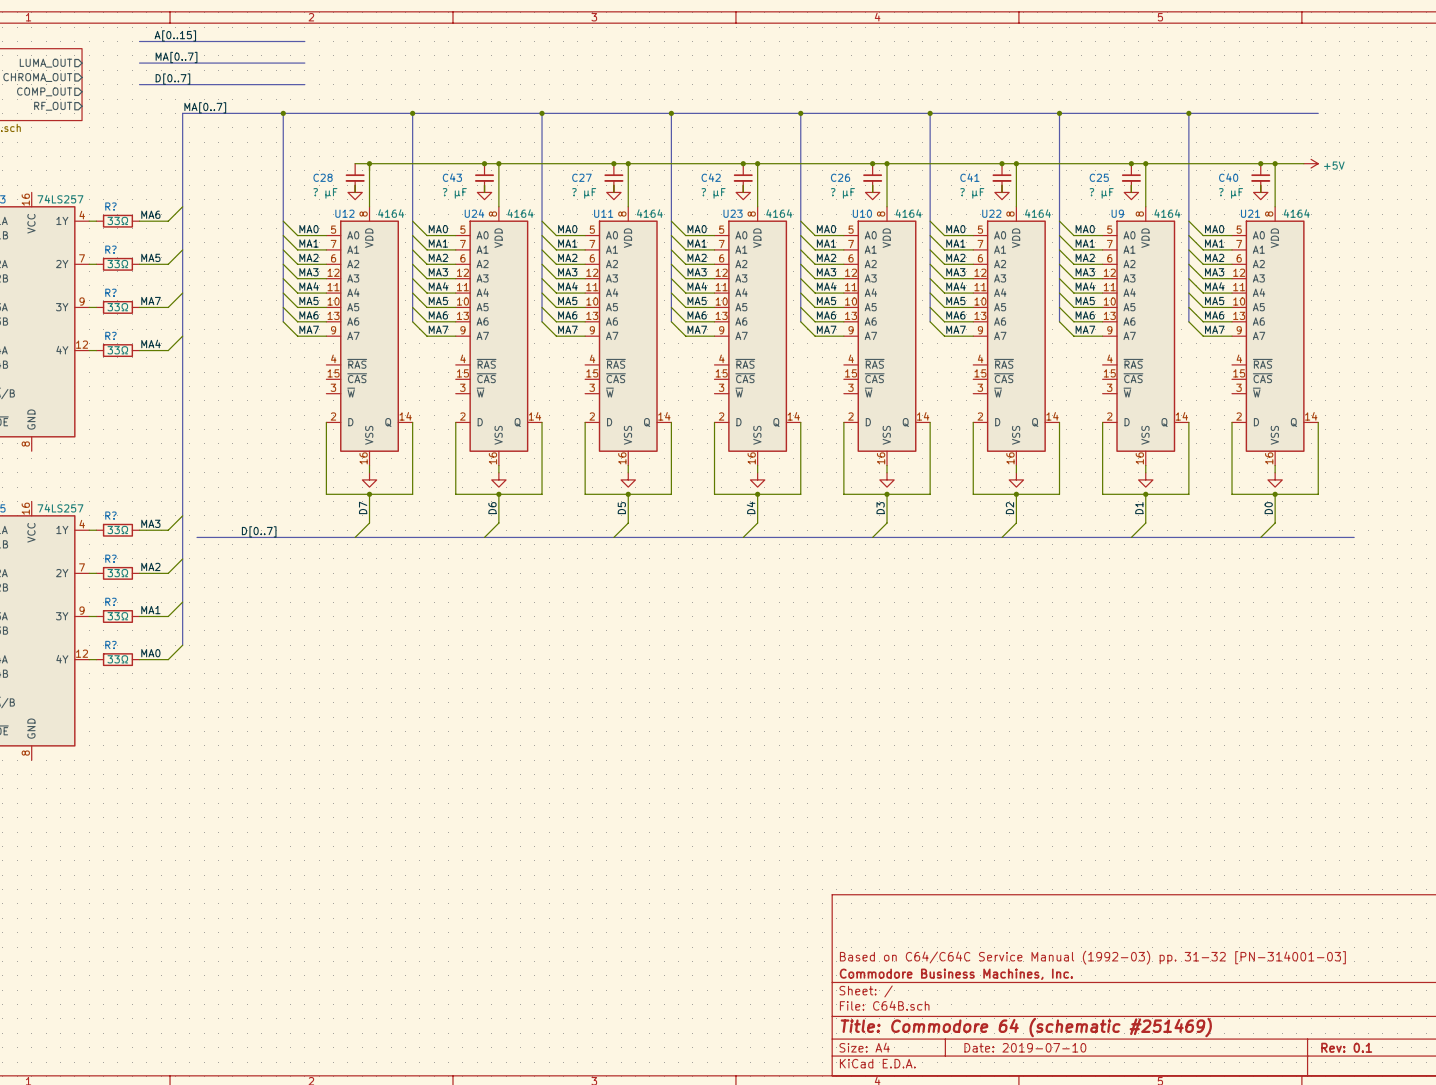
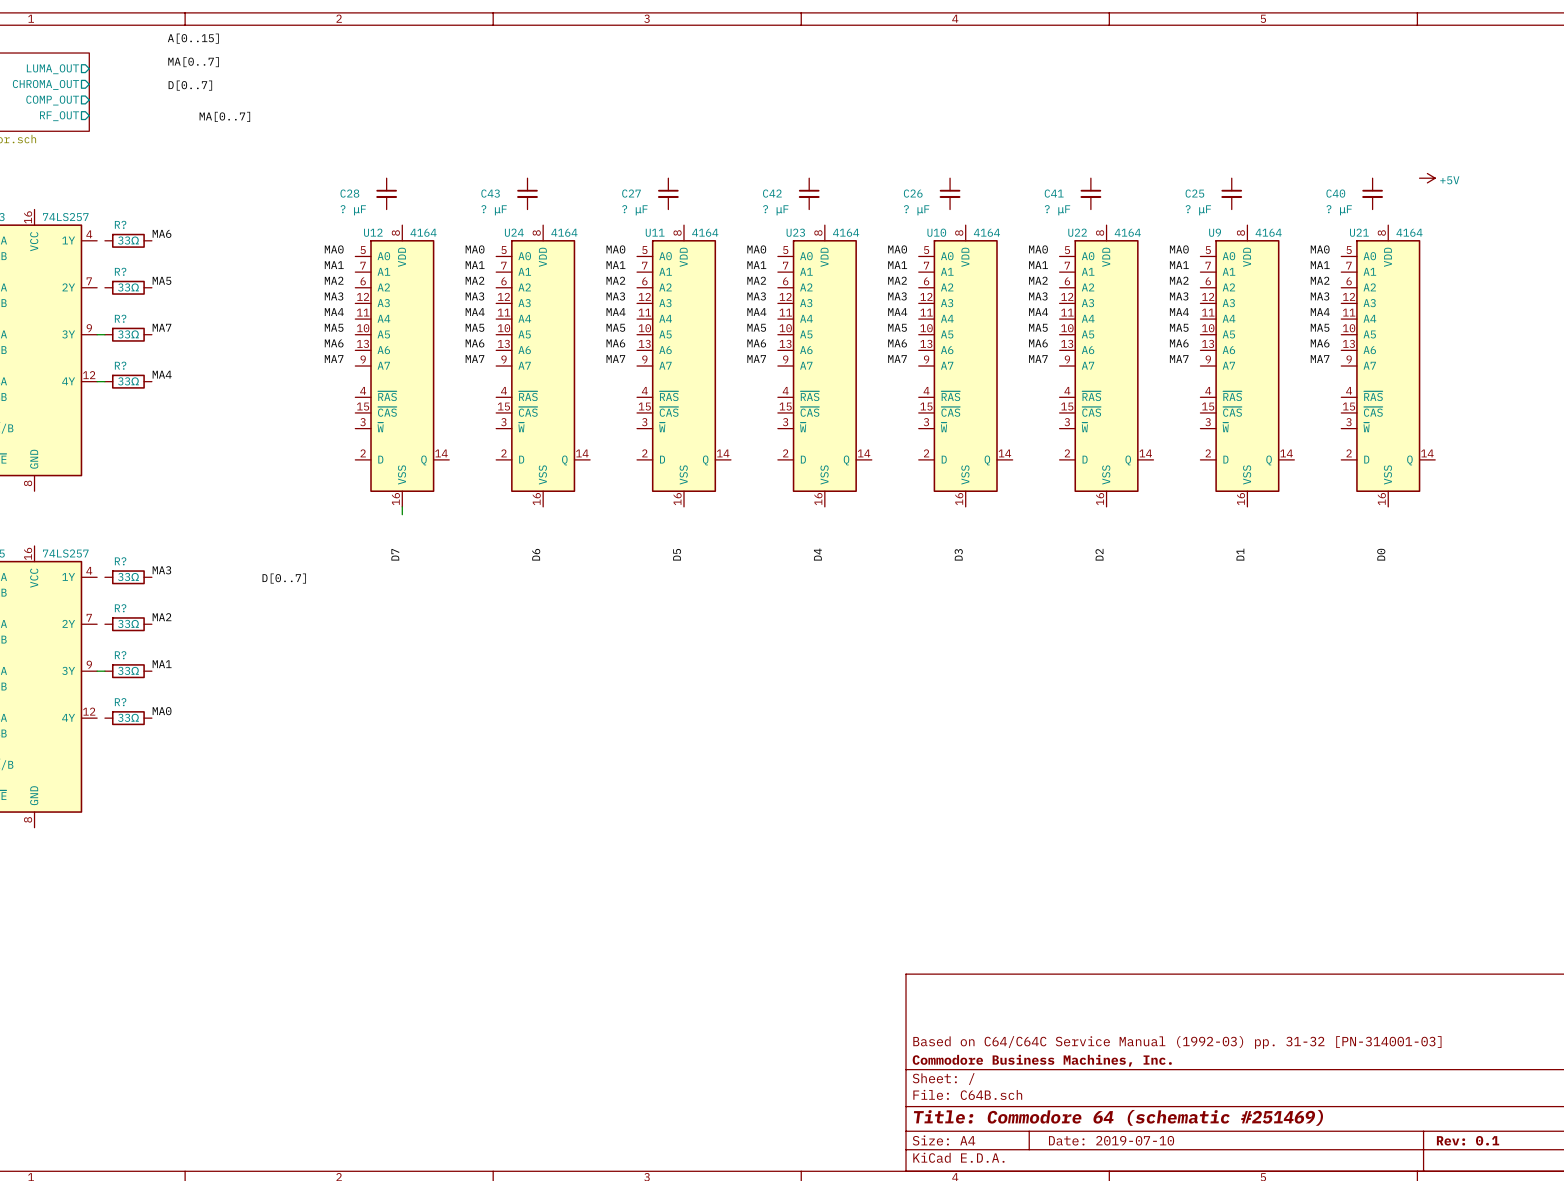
bus: (139, 41) (304, 41) -> none
bus: (139, 63) (304, 63) -> none
bus: (139, 84) (304, 84) -> none
bus: (283, 113) (283, 321) -> none
junction: (283, 113) -> none
bus: (412, 113) (412, 321) -> none
junction: (412, 113) -> none
bus: (542, 113) (542, 321) -> none
junction: (542, 113) -> none
bus: (671, 113) (671, 321) -> none
junction: (671, 113) -> none
bus: (800, 113) (800, 321) -> none
junction: (800, 113) -> none
bus: (930, 113) (930, 321) -> none
junction: (930, 113) -> none
bus: (1059, 113) (1059, 321) -> none
junction: (1059, 113) -> none
bus: (1188, 113) (1188, 321) -> none
junction: (1188, 113) -> none
bus: (1318, 113) (182, 113) (182, 645) -> none
wire: (355, 163) (1303, 163) -> none
wire: (369, 163) (369, 206) -> none
junction: (369, 163) -> none
junction: (484, 163) -> none
wire: (498, 163) (498, 206) -> none
junction: (498, 163) -> none
junction: (613, 163) -> none
wire: (628, 163) (628, 206) -> none
junction: (628, 163) -> none
junction: (743, 163) -> none
wire: (757, 163) (757, 206) -> none
junction: (757, 163) -> none
junction: (872, 163) -> none
wire: (887, 163) (887, 206) -> none
junction: (887, 163) -> none
junction: (1002, 163) -> none
wire: (1016, 163) (1016, 206) -> none
junction: (1016, 163) -> none
junction: (1131, 163) -> none
wire: (1145, 163) (1145, 206) -> none
junction: (1145, 163) -> none
junction: (1260, 163) -> none
wire: (1275, 163) (1275, 206) -> none
junction: (1275, 163) -> none
power symbol: (355, 192) -> none
power symbol: (484, 192) -> none
power symbol: (613, 192) -> none
power symbol: (743, 192) -> none
power symbol: (872, 192) -> none
power symbol: (1002, 192) -> none
power symbol: (1131, 192) -> none
power symbol: (1260, 192) -> none
wire: (182, 206) (168, 221) (139, 221) -> none
wire: (89, 221) (96, 221) -> none
wire: (283, 221) (297, 235) (326, 235) -> none
wire: (412, 221) (427, 235) (455, 235) -> none
wire: (542, 221) (556, 235) (585, 235) -> none
wire: (671, 221) (685, 235) (714, 235) -> none
wire: (800, 221) (815, 235) (843, 235) -> none
wire: (930, 221) (944, 235) (973, 235) -> none
wire: (1059, 221) (1073, 235) (1102, 235) -> none
wire: (1188, 221) (1203, 235) (1232, 235) -> none
wire: (283, 235) (297, 249) (326, 249) -> none
wire: (412, 235) (427, 249) (455, 249) -> none
wire: (542, 235) (556, 249) (585, 249) -> none
wire: (671, 235) (685, 249) (714, 249) -> none
wire: (800, 235) (815, 249) (843, 249) -> none
wire: (930, 235) (944, 249) (973, 249) -> none
wire: (1059, 235) (1073, 249) (1102, 249) -> none
wire: (1188, 235) (1203, 249) (1232, 249) -> none
wire: (182, 249) (168, 264) (139, 264) -> none
wire: (283, 249) (297, 264) (326, 264) -> none
wire: (412, 249) (427, 264) (455, 264) -> none
wire: (542, 249) (556, 264) (585, 264) -> none
wire: (671, 249) (685, 264) (714, 264) -> none
wire: (800, 249) (815, 264) (843, 264) -> none
wire: (930, 249) (944, 264) (973, 264) -> none
wire: (1059, 249) (1073, 264) (1102, 264) -> none
wire: (1188, 249) (1203, 264) (1232, 264) -> none
wire: (89, 264) (96, 264) -> none
wire: (283, 264) (297, 278) (326, 278) -> none
wire: (412, 264) (427, 278) (455, 278) -> none
wire: (542, 264) (556, 278) (585, 278) -> none
wire: (671, 264) (685, 278) (714, 278) -> none
wire: (800, 264) (815, 278) (843, 278) -> none
wire: (930, 264) (944, 278) (973, 278) -> none
wire: (1059, 264) (1073, 278) (1102, 278) -> none
wire: (1188, 264) (1203, 278) (1232, 278) -> none
wire: (283, 278) (297, 293) (326, 293) -> none
wire: (412, 278) (427, 293) (455, 293) -> none
wire: (542, 278) (556, 293) (585, 293) -> none
wire: (671, 278) (685, 293) (714, 293) -> none
wire: (800, 278) (815, 293) (843, 293) -> none
wire: (930, 278) (944, 293) (973, 293) -> none
wire: (1059, 278) (1073, 293) (1102, 293) -> none
wire: (1188, 278) (1203, 293) (1232, 293) -> none
wire: (182, 293) (168, 307) (139, 307) -> none
wire: (283, 293) (297, 307) (326, 307) -> none
wire: (412, 293) (427, 307) (455, 307) -> none
wire: (542, 293) (556, 307) (585, 307) -> none
wire: (671, 293) (685, 307) (714, 307) -> none
wire: (800, 293) (815, 307) (843, 307) -> none
wire: (930, 293) (944, 307) (973, 307) -> none
wire: (1059, 293) (1073, 307) (1102, 307) -> none
wire: (1188, 293) (1203, 307) (1232, 307) -> none
wire: (283, 307) (297, 321) (326, 321) -> none
wire: (412, 307) (427, 321) (455, 321) -> none
wire: (542, 307) (556, 321) (585, 321) -> none
wire: (671, 307) (685, 321) (714, 321) -> none
wire: (800, 307) (815, 321) (843, 321) -> none
wire: (930, 307) (944, 321) (973, 321) -> none
wire: (1059, 307) (1073, 321) (1102, 321) -> none
wire: (1188, 307) (1203, 321) (1232, 321) -> none
wire: (283, 321) (297, 336) (326, 336) -> none
wire: (412, 321) (427, 336) (455, 336) -> none
wire: (542, 321) (556, 336) (585, 336) -> none
wire: (671, 321) (685, 336) (714, 336) -> none
wire: (800, 321) (815, 336) (843, 336) -> none
wire: (930, 321) (944, 336) (973, 336) -> none
wire: (1059, 321) (1073, 336) (1102, 336) -> none
wire: (1188, 321) (1203, 336) (1232, 336) -> none
wire: (182, 336) (168, 350) (139, 350) -> none
wire: (326, 422) (326, 494) (412, 494) (412, 422) -> none
wire: (455, 422) (455, 494) (542, 494) (542, 422) -> none
wire: (585, 422) (585, 494) (671, 494) (671, 422) -> none
wire: (714, 422) (714, 494) (800, 494) (800, 422) -> none
wire: (843, 422) (843, 494) (930, 494) (930, 422) -> none
wire: (973, 422) (973, 494) (1059, 494) (1059, 422) -> none
wire: (1102, 422) (1102, 494) (1188, 494) (1188, 422) -> none
wire: (1232, 422) (1232, 494) (1318, 494) (1318, 422) -> none
wire: (498, 465) (498, 472) -> none
wire: (628, 465) (628, 472) -> none
wire: (757, 465) (757, 472) -> none
wire: (887, 465) (887, 472) -> none
wire: (1016, 465) (1016, 472) -> none
wire: (1145, 465) (1145, 472) -> none
wire: (1275, 465) (1275, 472) -> none
power symbol: (369, 479) -> none
power symbol: (498, 479) -> none
power symbol: (628, 479) -> none
power symbol: (757, 479) -> none
power symbol: (887, 479) -> none
power symbol: (1016, 479) -> none
power symbol: (1145, 479) -> none
power symbol: (1275, 479) -> none
wire: (369, 494) (369, 523) (355, 537) -> none
junction: (369, 494) -> none
wire: (498, 494) (498, 523) (484, 537) -> none
junction: (498, 494) -> none
wire: (628, 494) (628, 523) (613, 537) -> none
junction: (628, 494) -> none
wire: (757, 494) (757, 523) (743, 537) -> none
junction: (757, 494) -> none
wire: (887, 494) (887, 523) (872, 537) -> none
junction: (887, 494) -> none
wire: (1016, 494) (1016, 523) (1002, 537) -> none
junction: (1016, 494) -> none
wire: (1145, 494) (1145, 523) (1131, 537) -> none
junction: (1145, 494) -> none
wire: (1275, 494) (1275, 523) (1260, 537) -> none
junction: (1275, 494) -> none
wire: (182, 515) (168, 530) (139, 530) -> none
wire: (89, 530) (96, 530) -> none
bus: (197, 537) (1354, 537) -> none
wire: (182, 558) (168, 573) (139, 573) -> none
wire: (89, 573) (96, 573) -> none
wire: (182, 602) (168, 616) (139, 616) -> none
wire: (182, 645) (168, 659) (139, 659) -> none
wire: (89, 659) (96, 659) -> none

